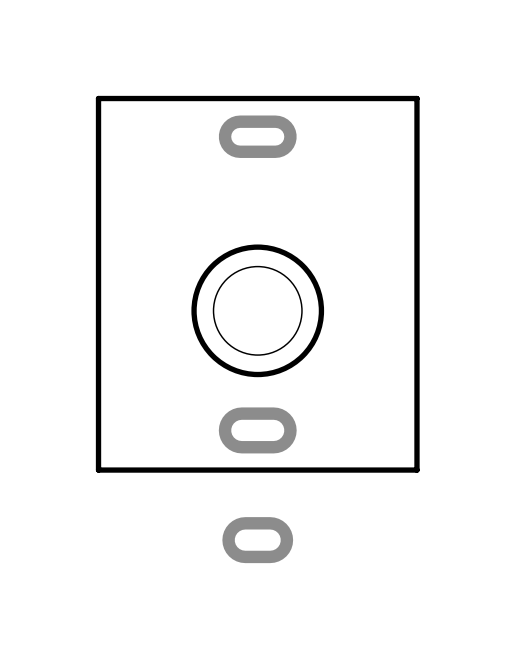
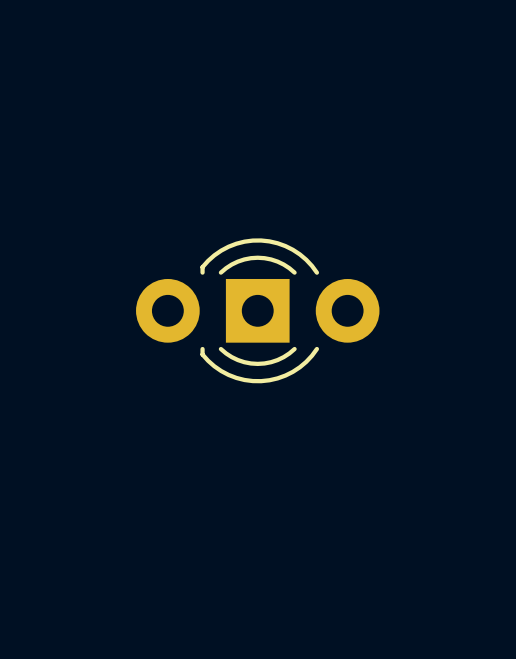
part footprint: [95, 95, 420, 564] -> [136, 238, 380, 384]

